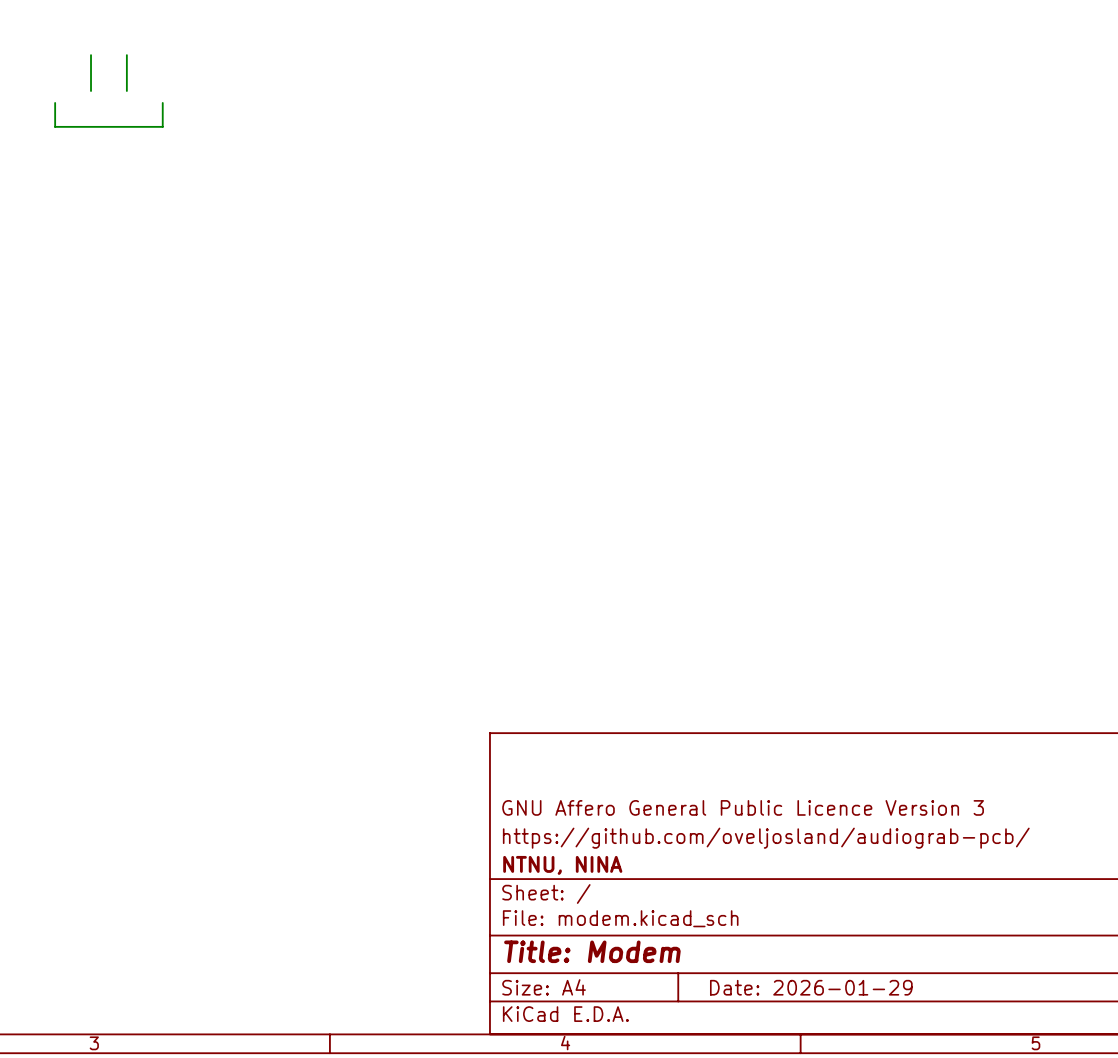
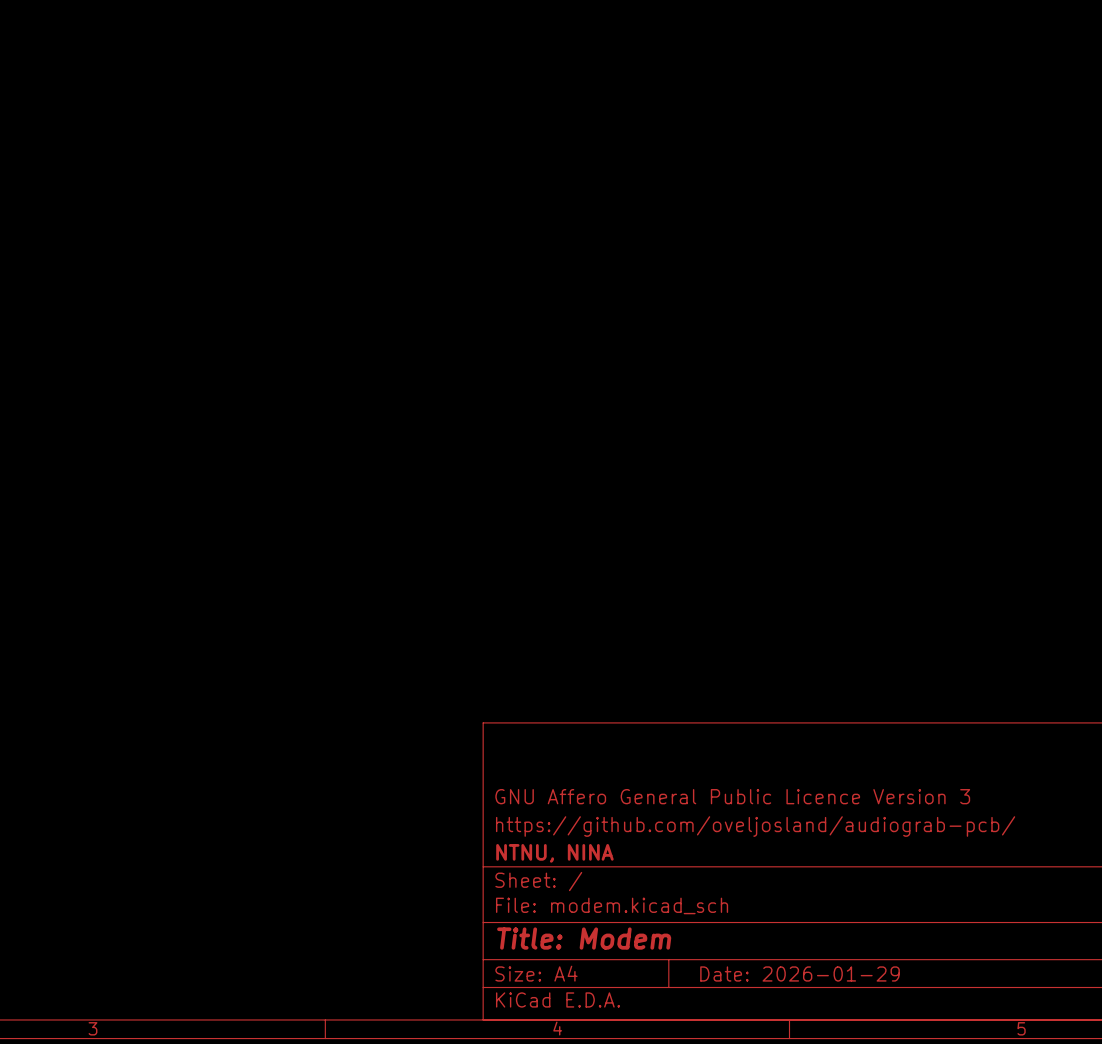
wire: (91, 55) (91, 91) -> none
wire: (126, 55) (126, 91) -> none
wire: (55, 102) (55, 126) (162, 126) (162, 102) -> none

